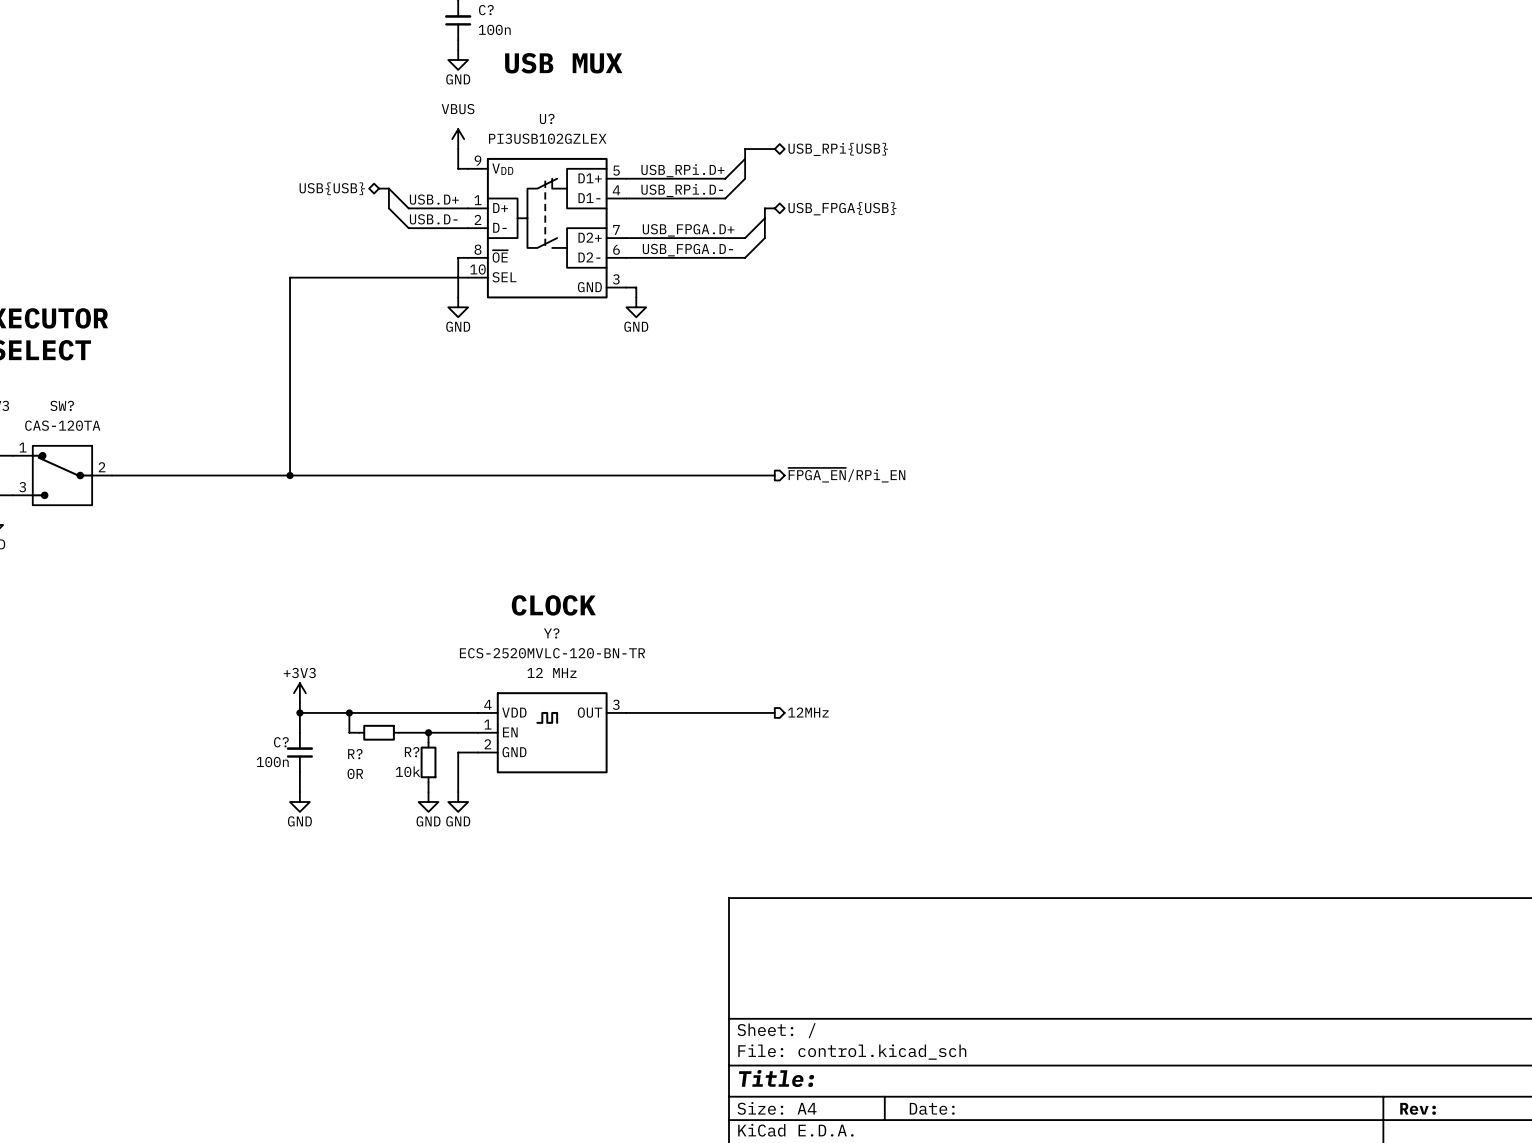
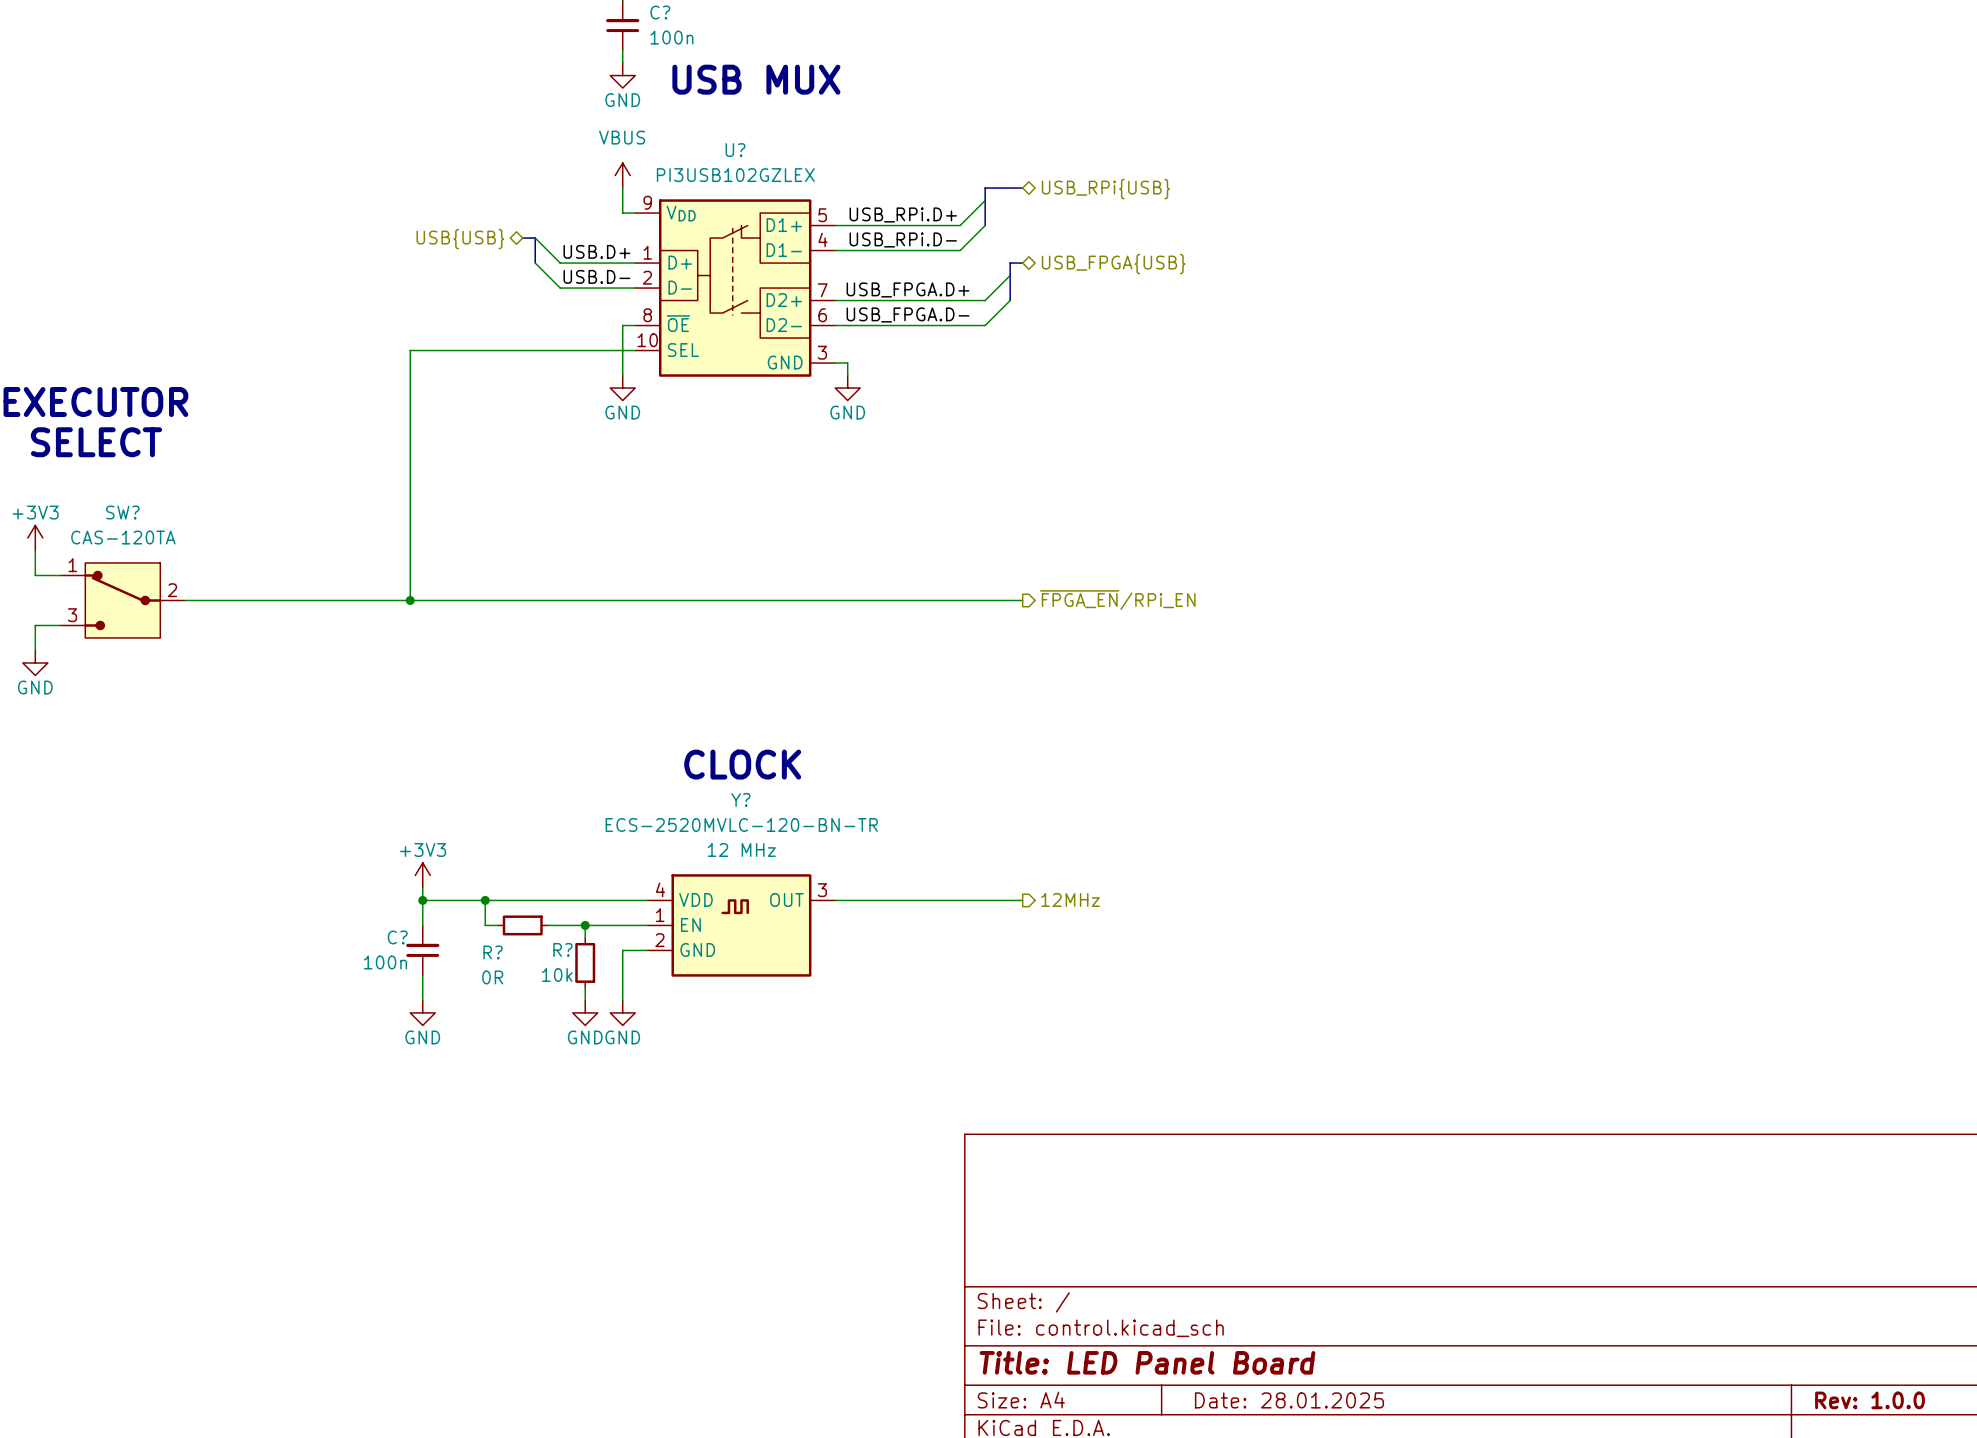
title block: Title: (776, 1078) -> Title: LED Panel Board (1147, 1362)
title block: Date: (932, 1108) -> Date: 28.01.2025 (1289, 1400)
title block: Rev: (1418, 1108) -> Rev: 1.0.0 (1870, 1400)

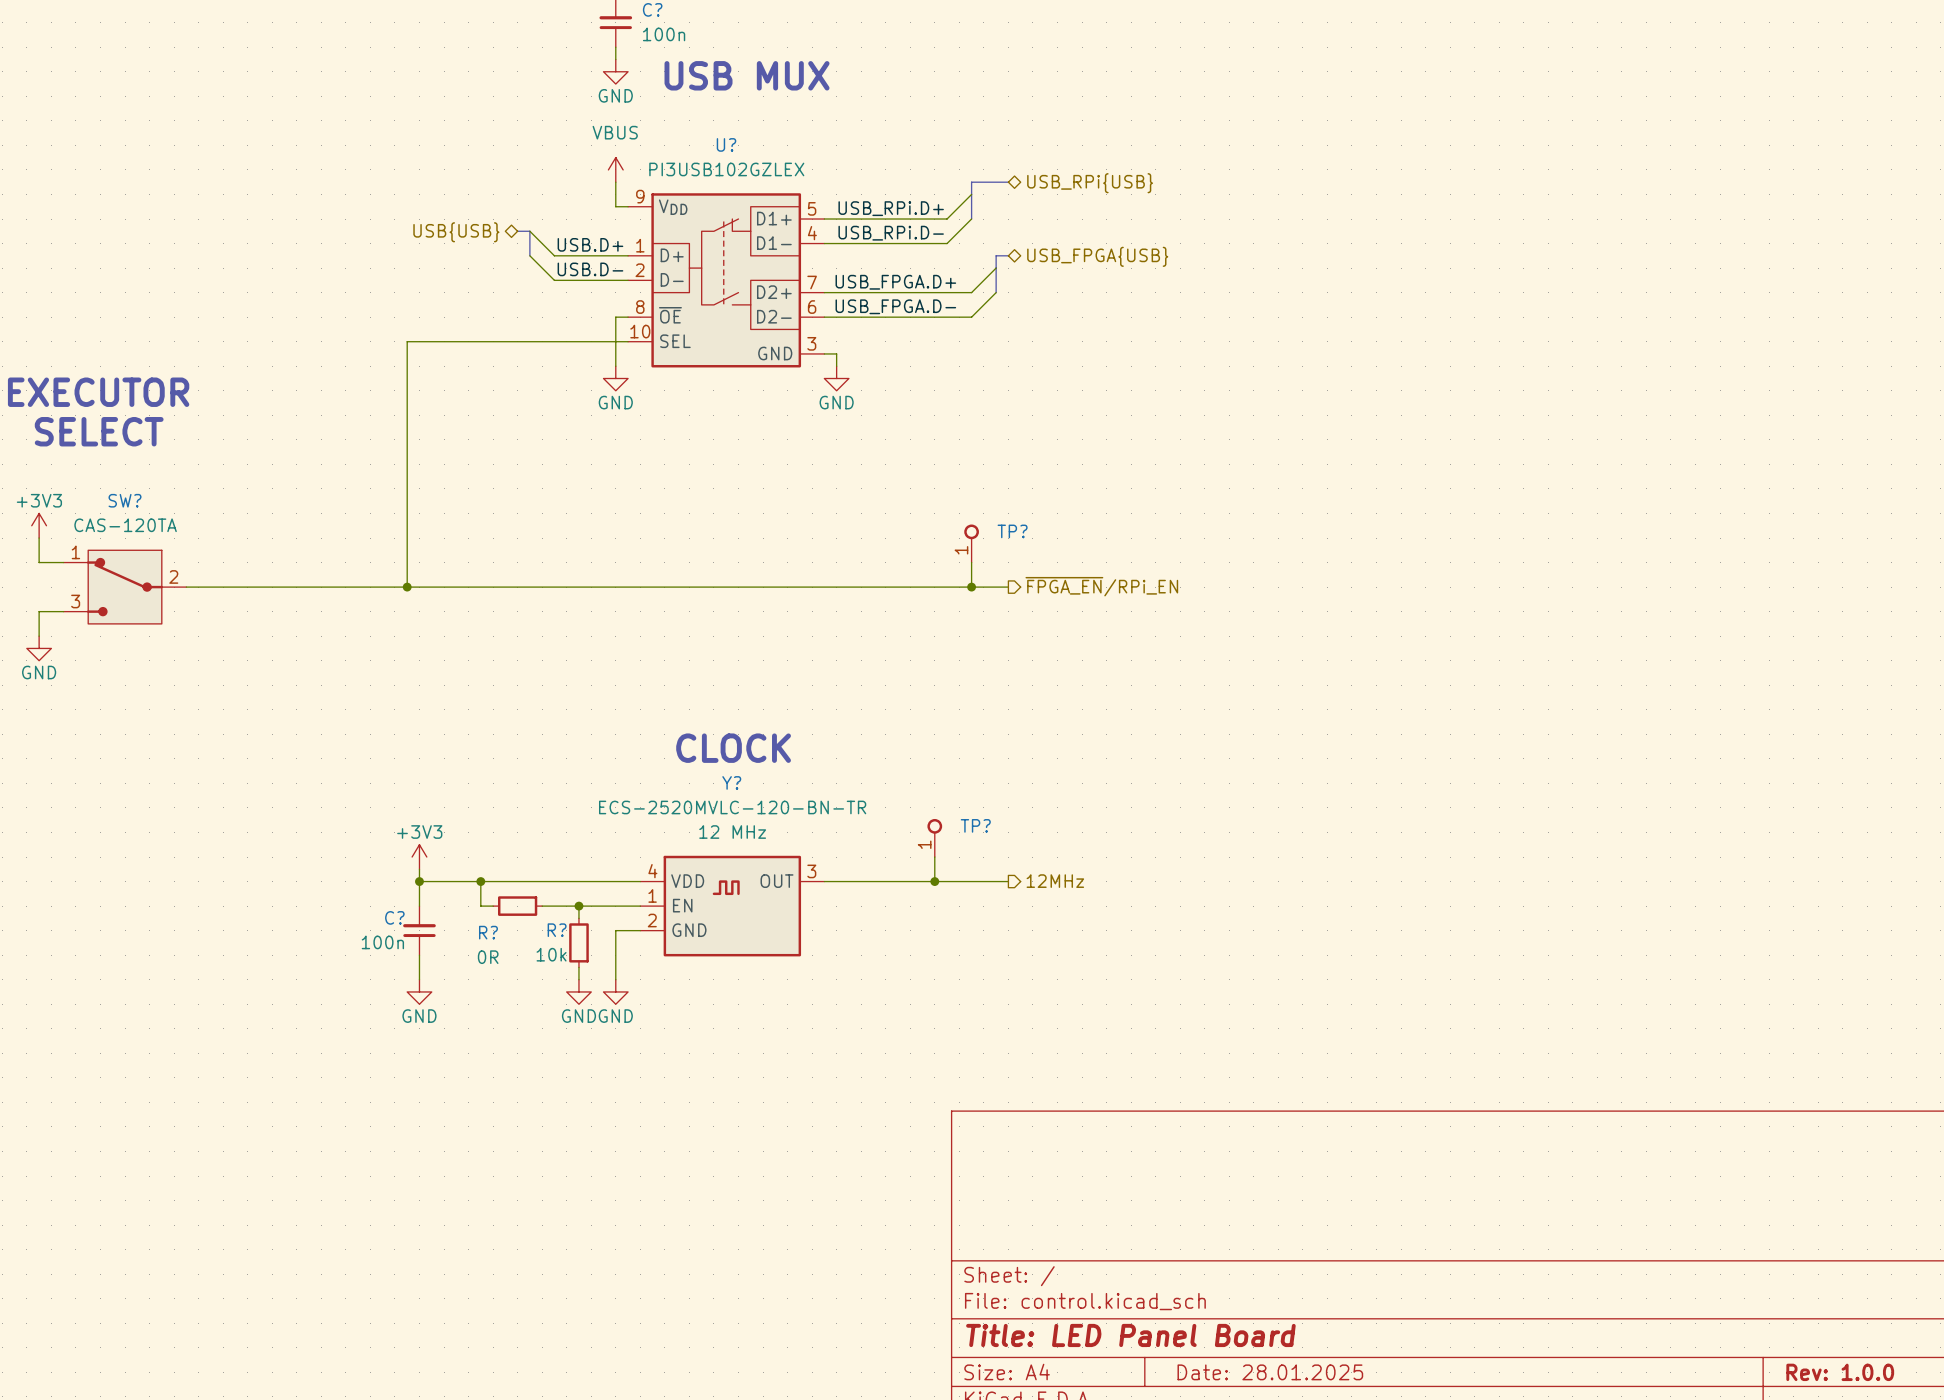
TP?: none -> (971, 543)
wire: none -> (971, 562) (971, 587)
junction: none -> (971, 587)
TP?: none -> (934, 838)
wire: none -> (934, 857) (934, 881)
junction: none -> (934, 881)

